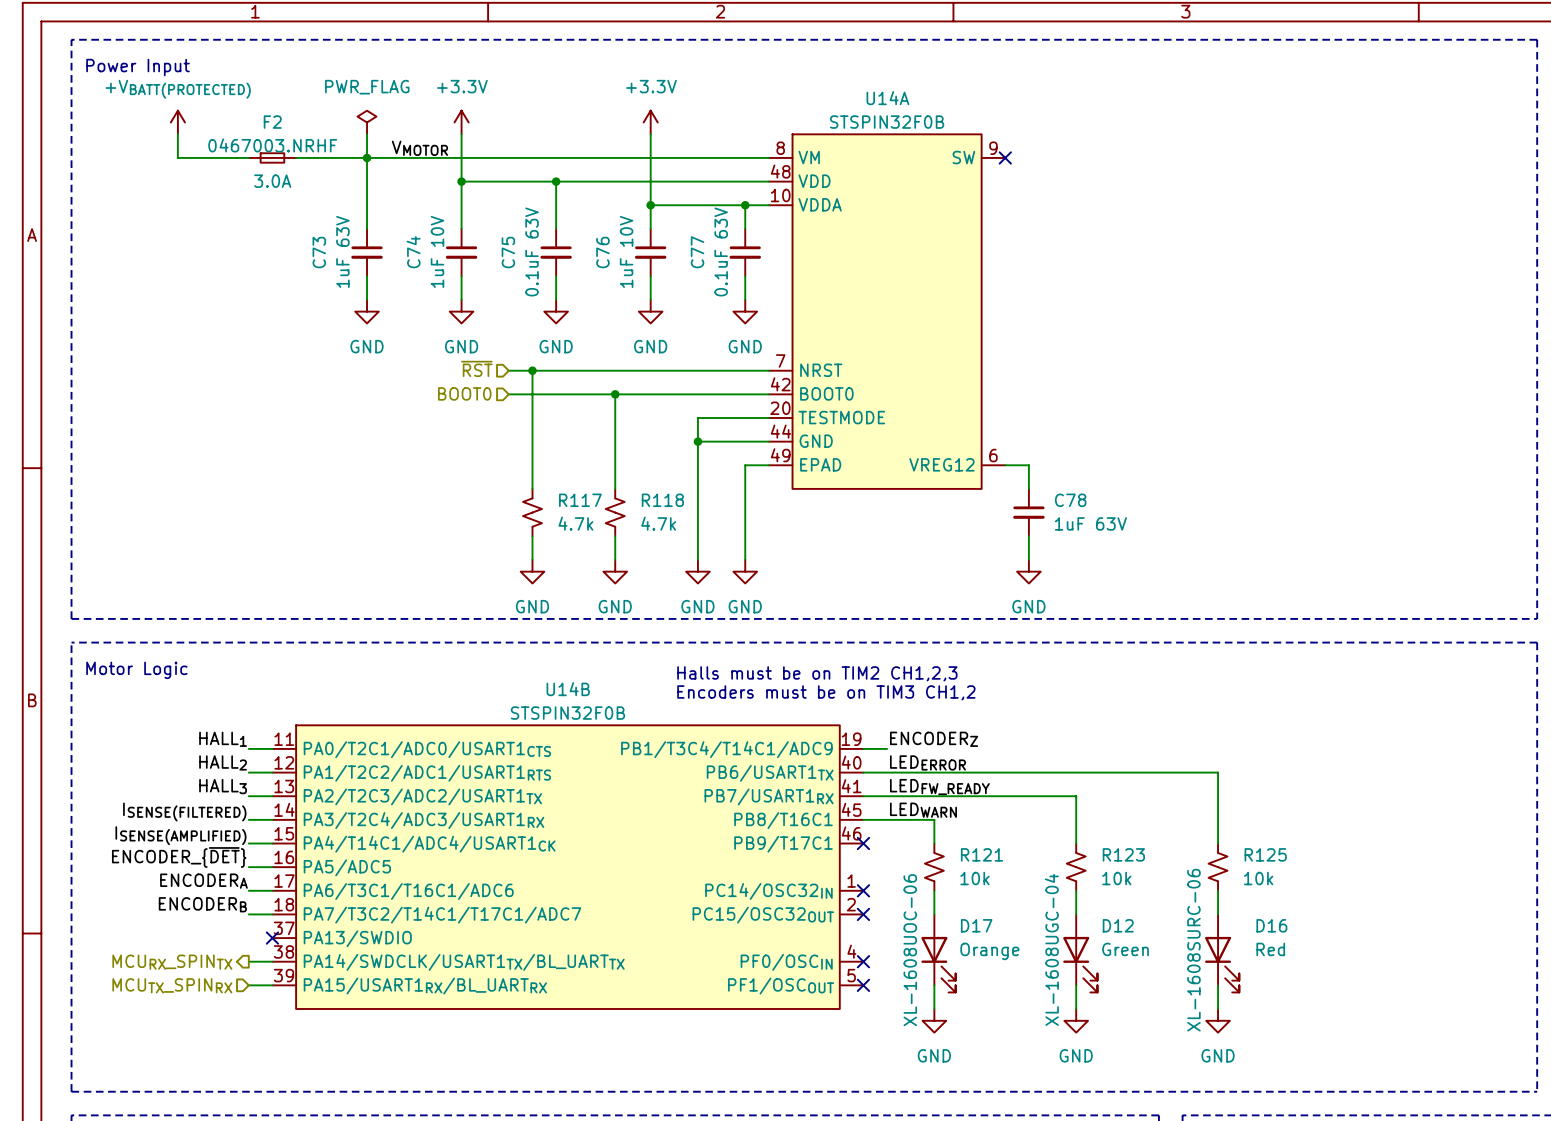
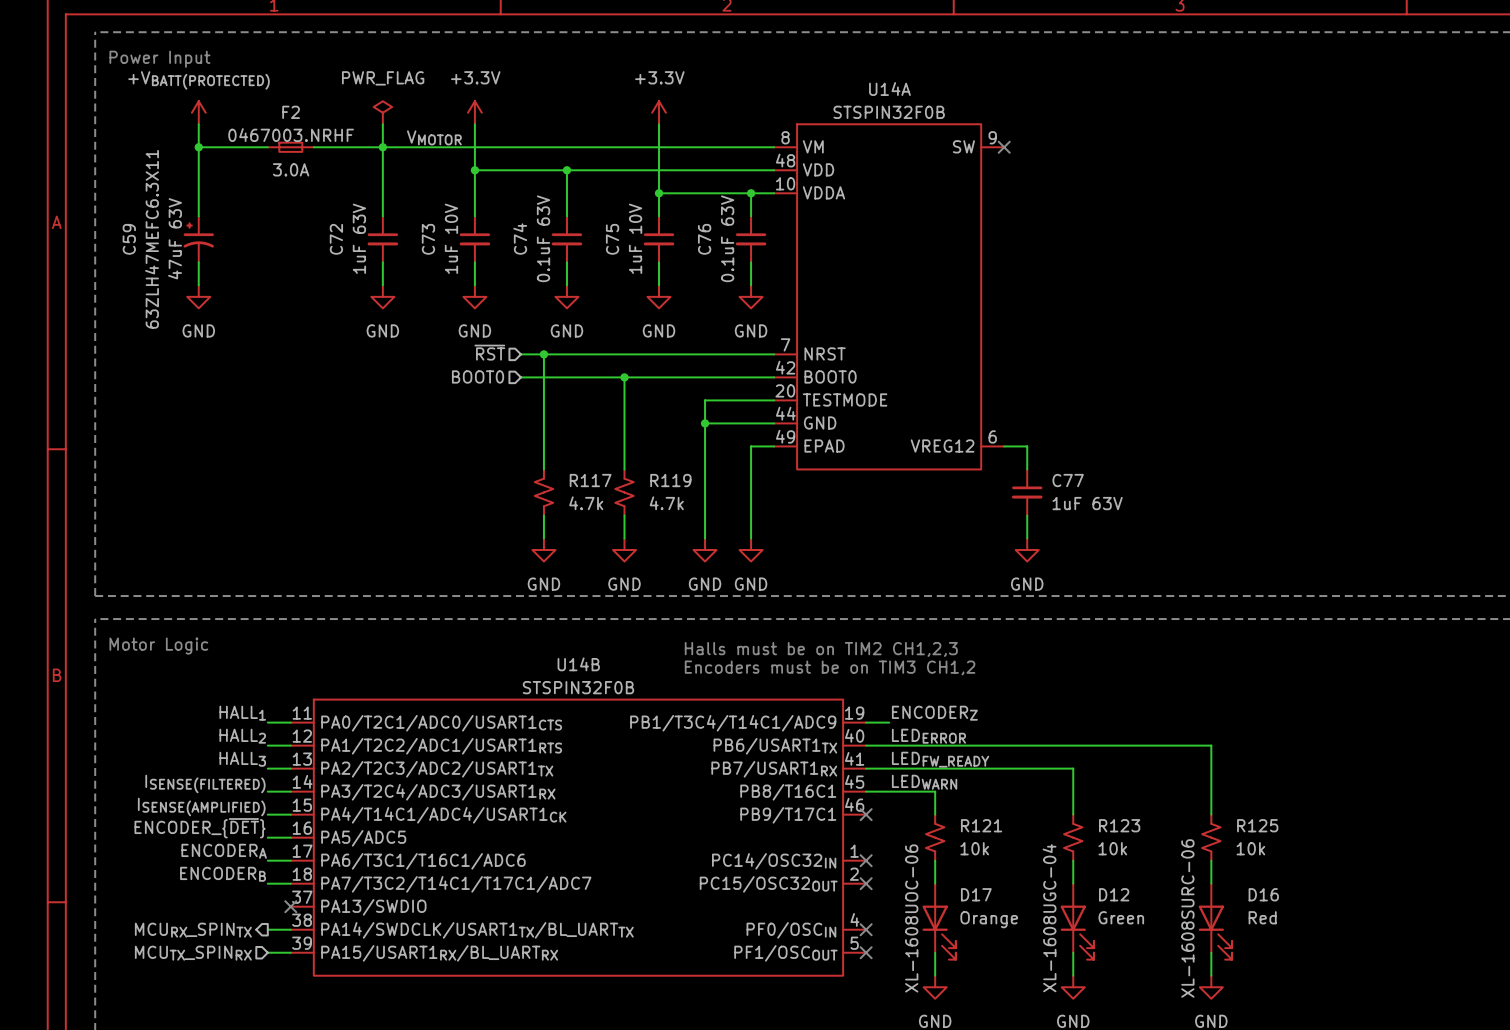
wire: none -> (198, 147) (198, 216)
junction: none -> (198, 147)
C59: none -> 63ZLH47MEFC6.3X11 (198, 239)
C73 name: C73 (319, 252) -> C72 (336, 239)
C74 name: C74 (413, 252) -> C73 (428, 239)
C75 name: C75 (508, 252) -> C74 (520, 239)
C76 name: C76 (602, 252) -> C75 (612, 239)
C77 name: C77 (697, 252) -> C76 (704, 239)
wire: none -> (198, 262) (198, 285)
power symbol: none -> GND (198, 296)
R118 name: R118 (662, 500) -> R119 (670, 480)
C78 name: C78 (1070, 500) -> C77 (1068, 480)

